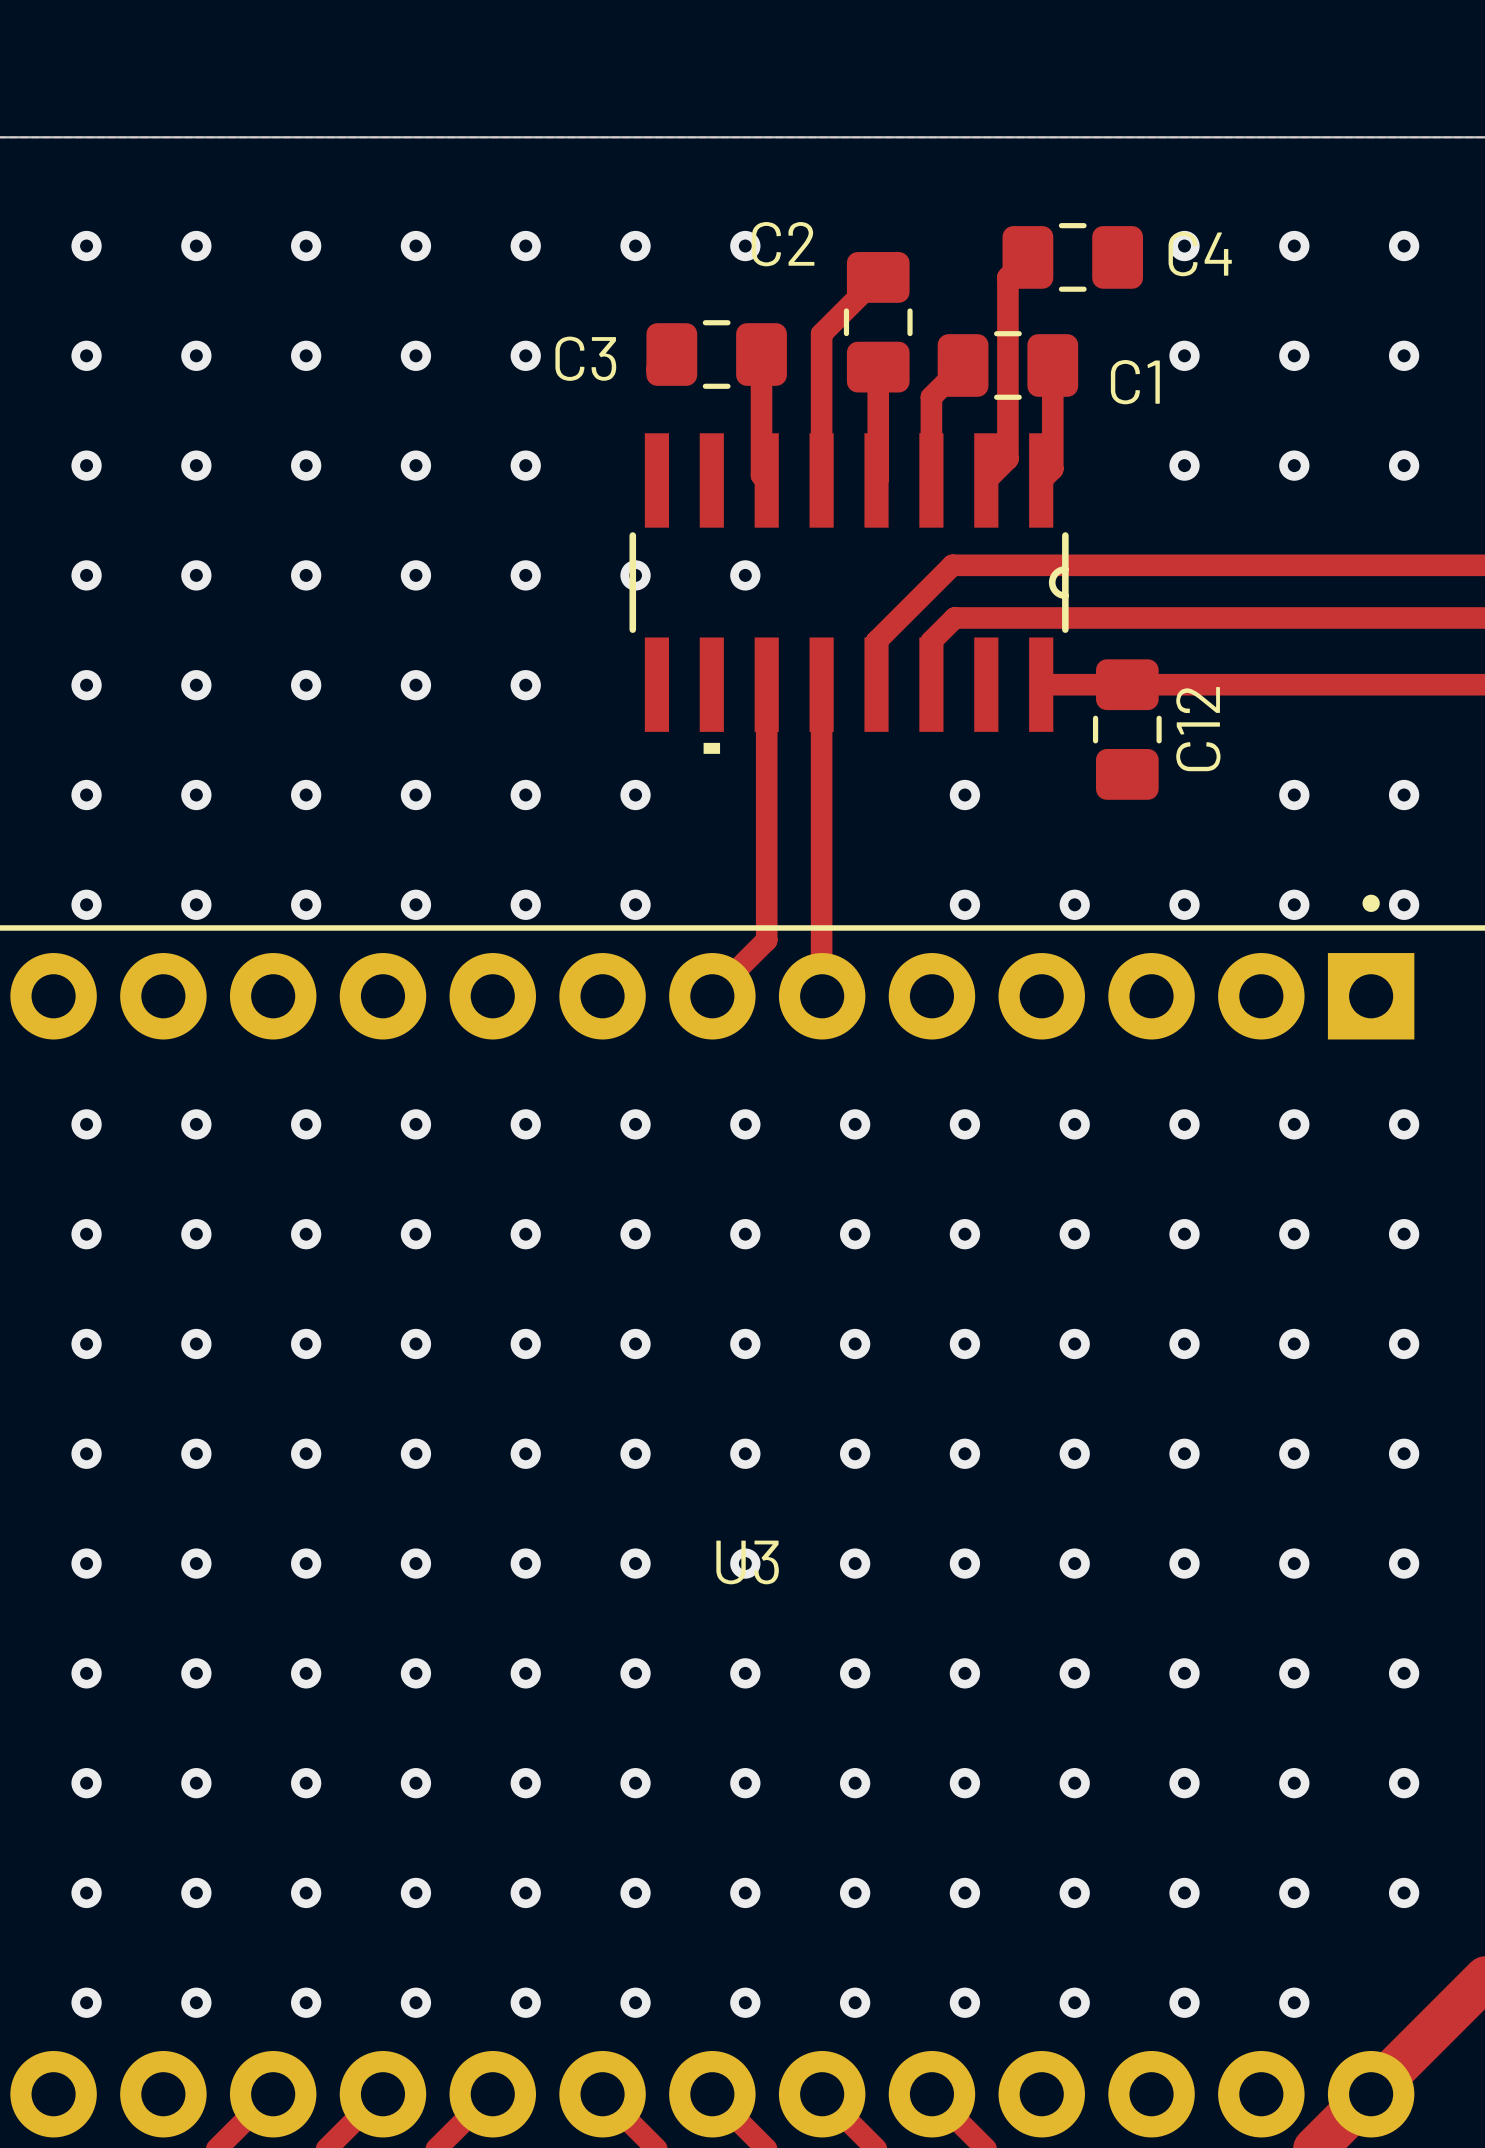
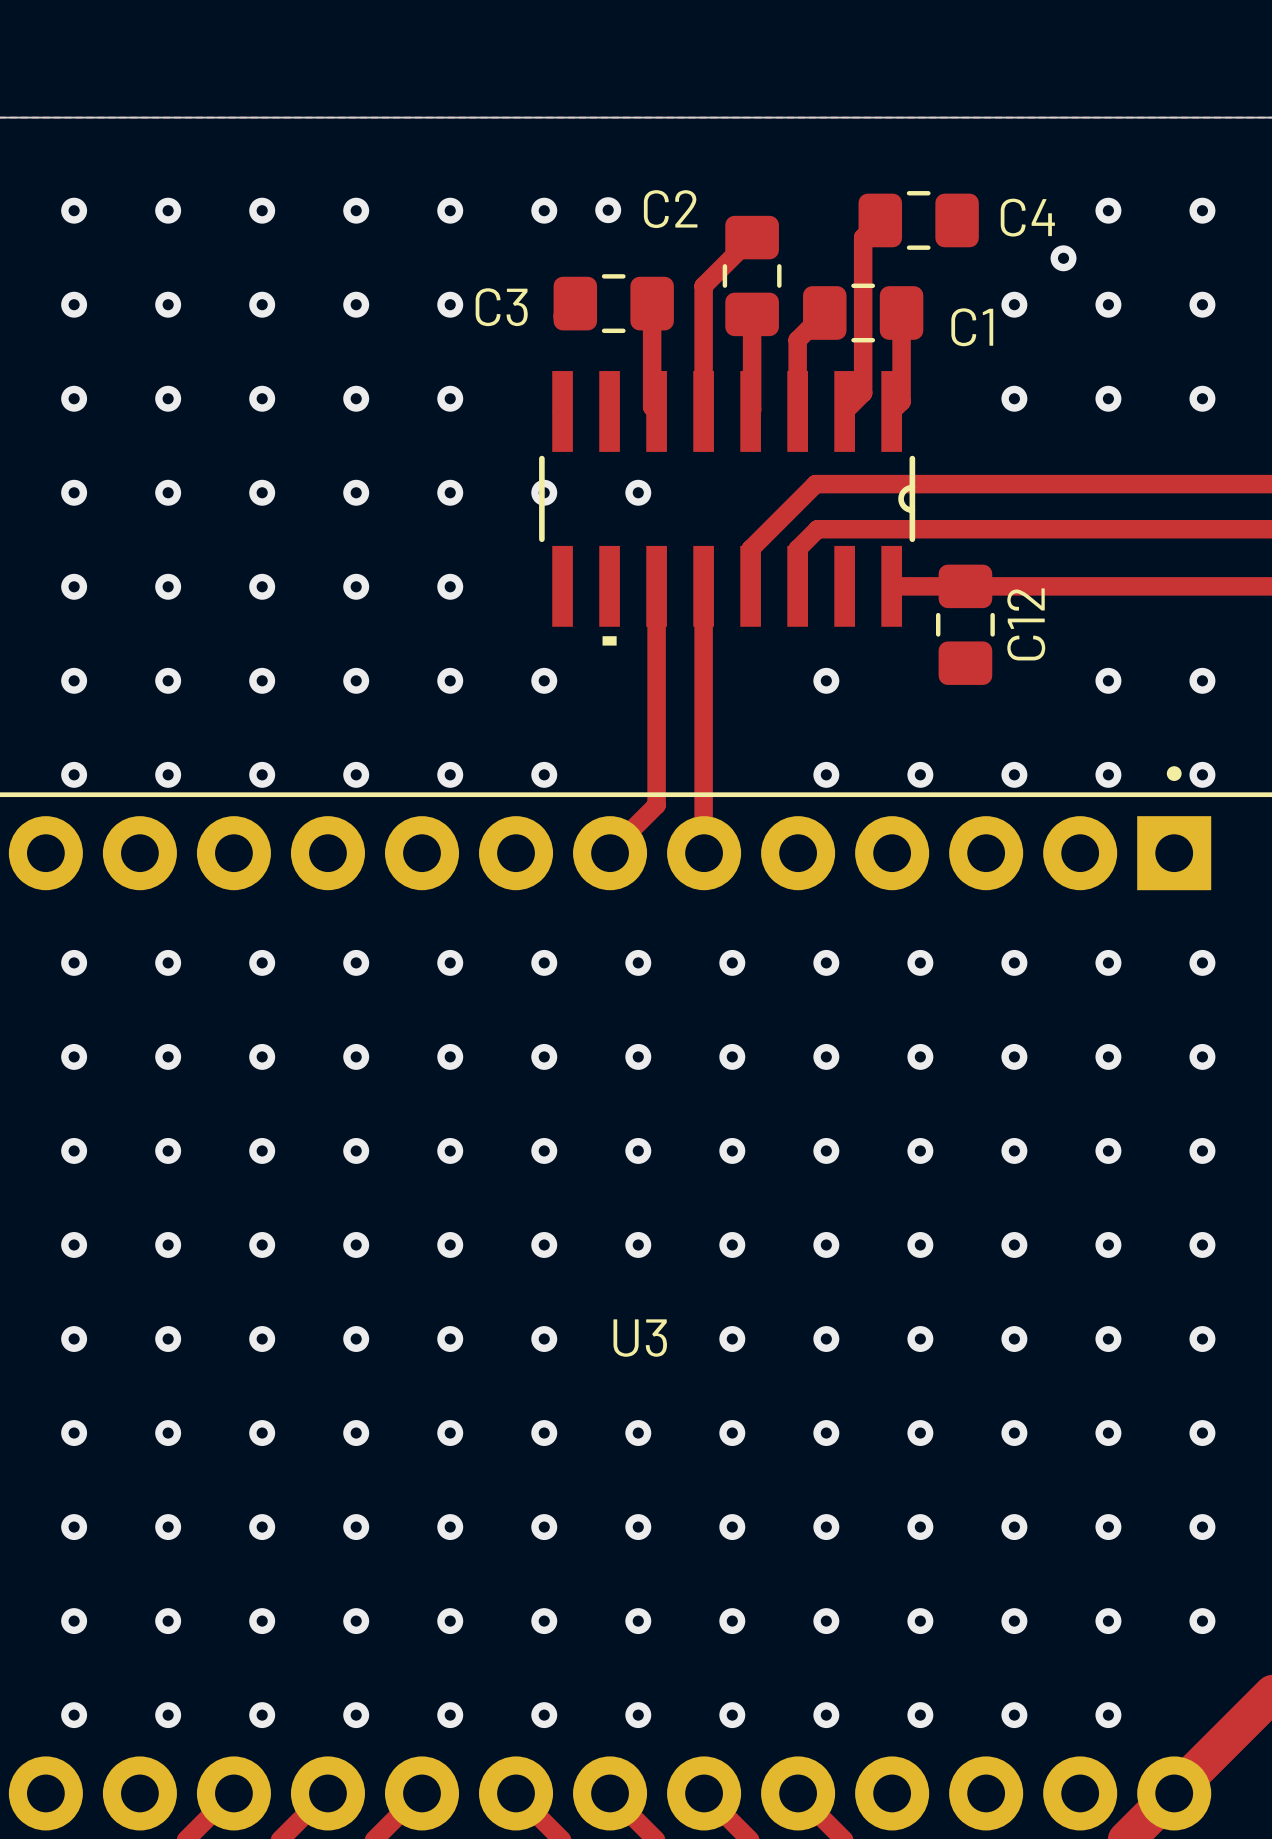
via position: (745, 246) -> (608, 210)
via position: (1184, 246) -> (1063, 258)
via: (745, 1563) -> none

